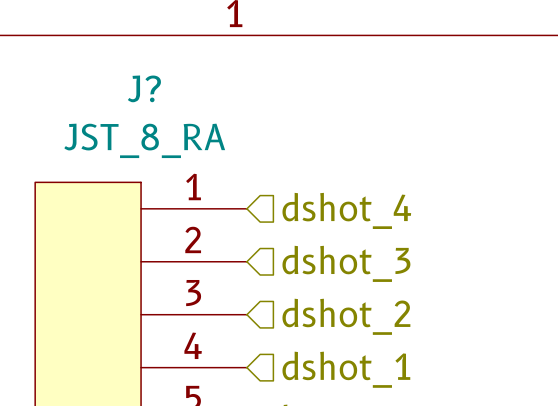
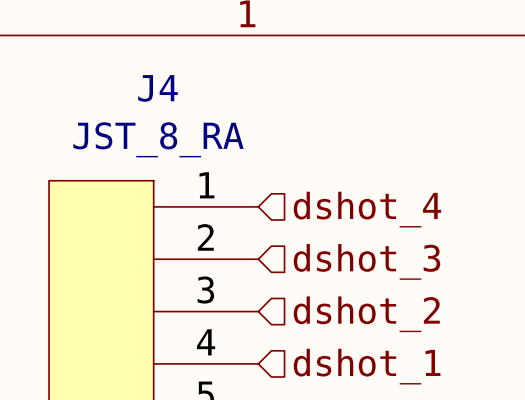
J? name: J? (144, 88) -> J4 (157, 88)

